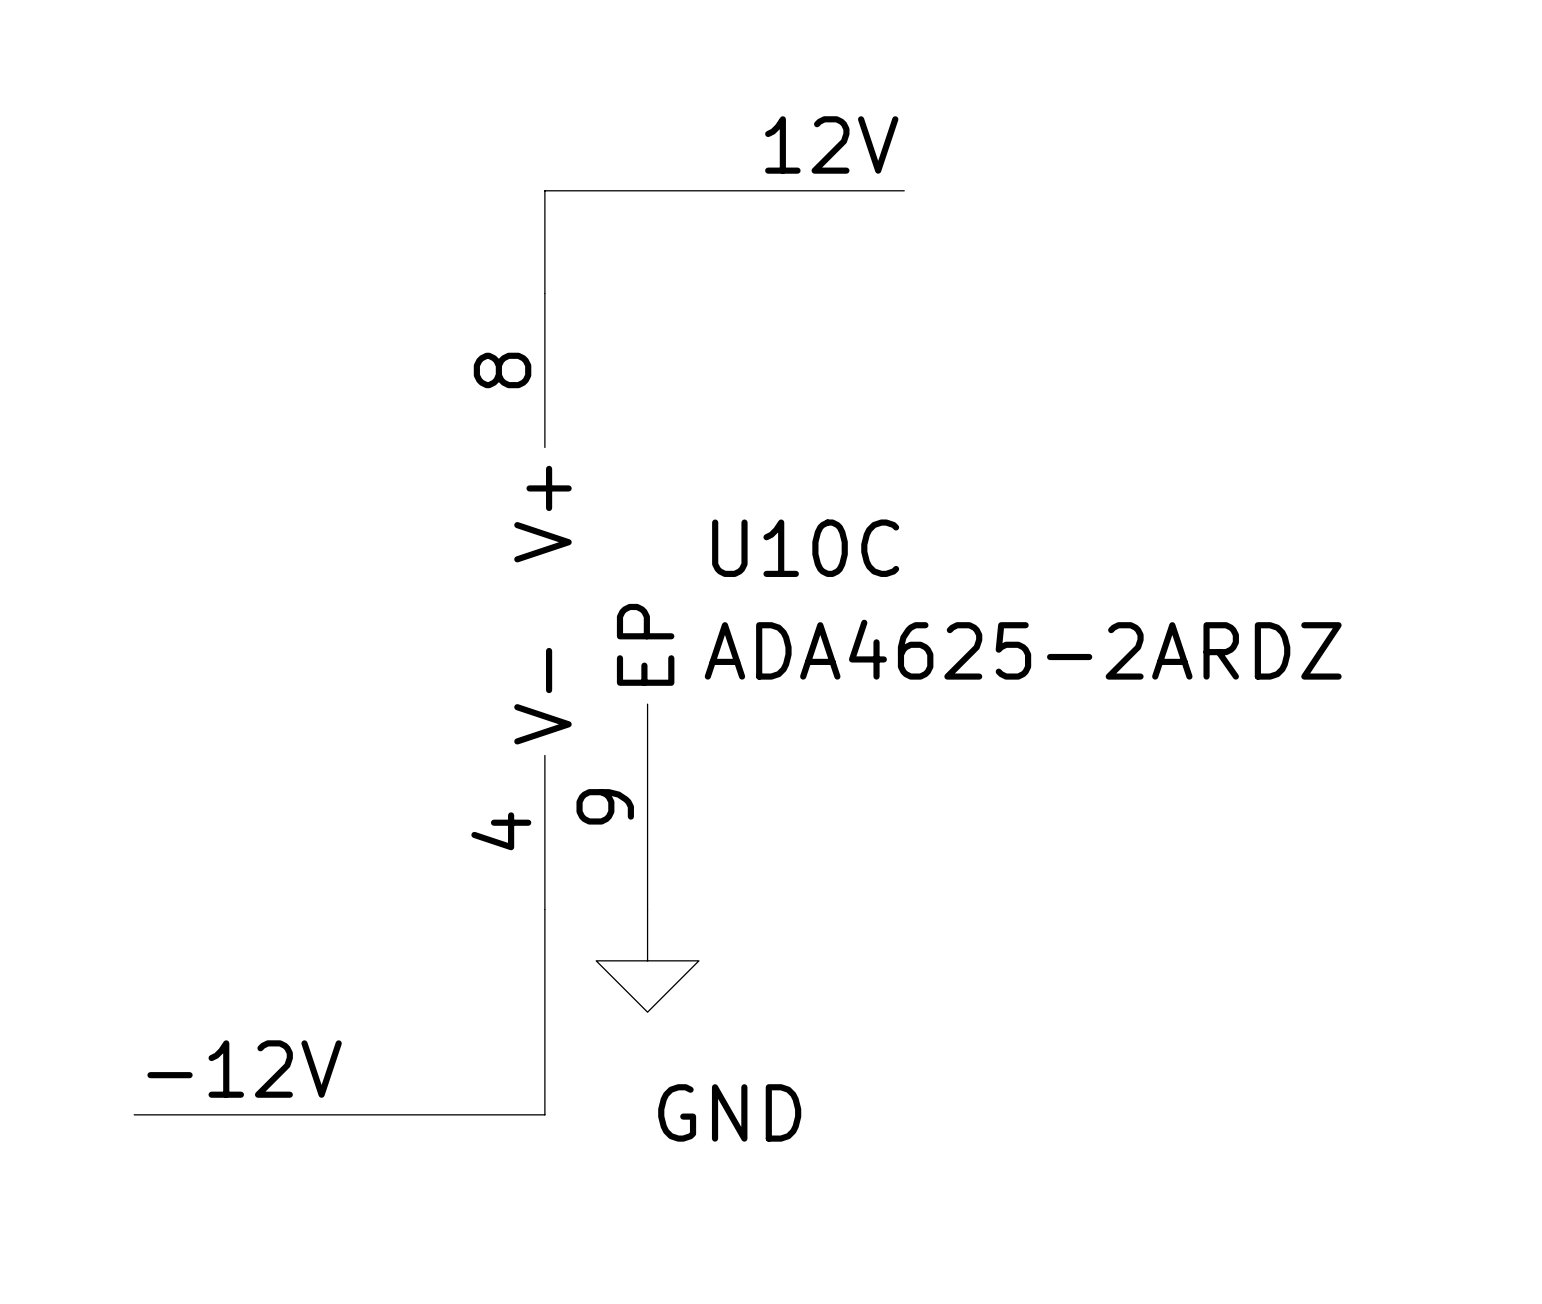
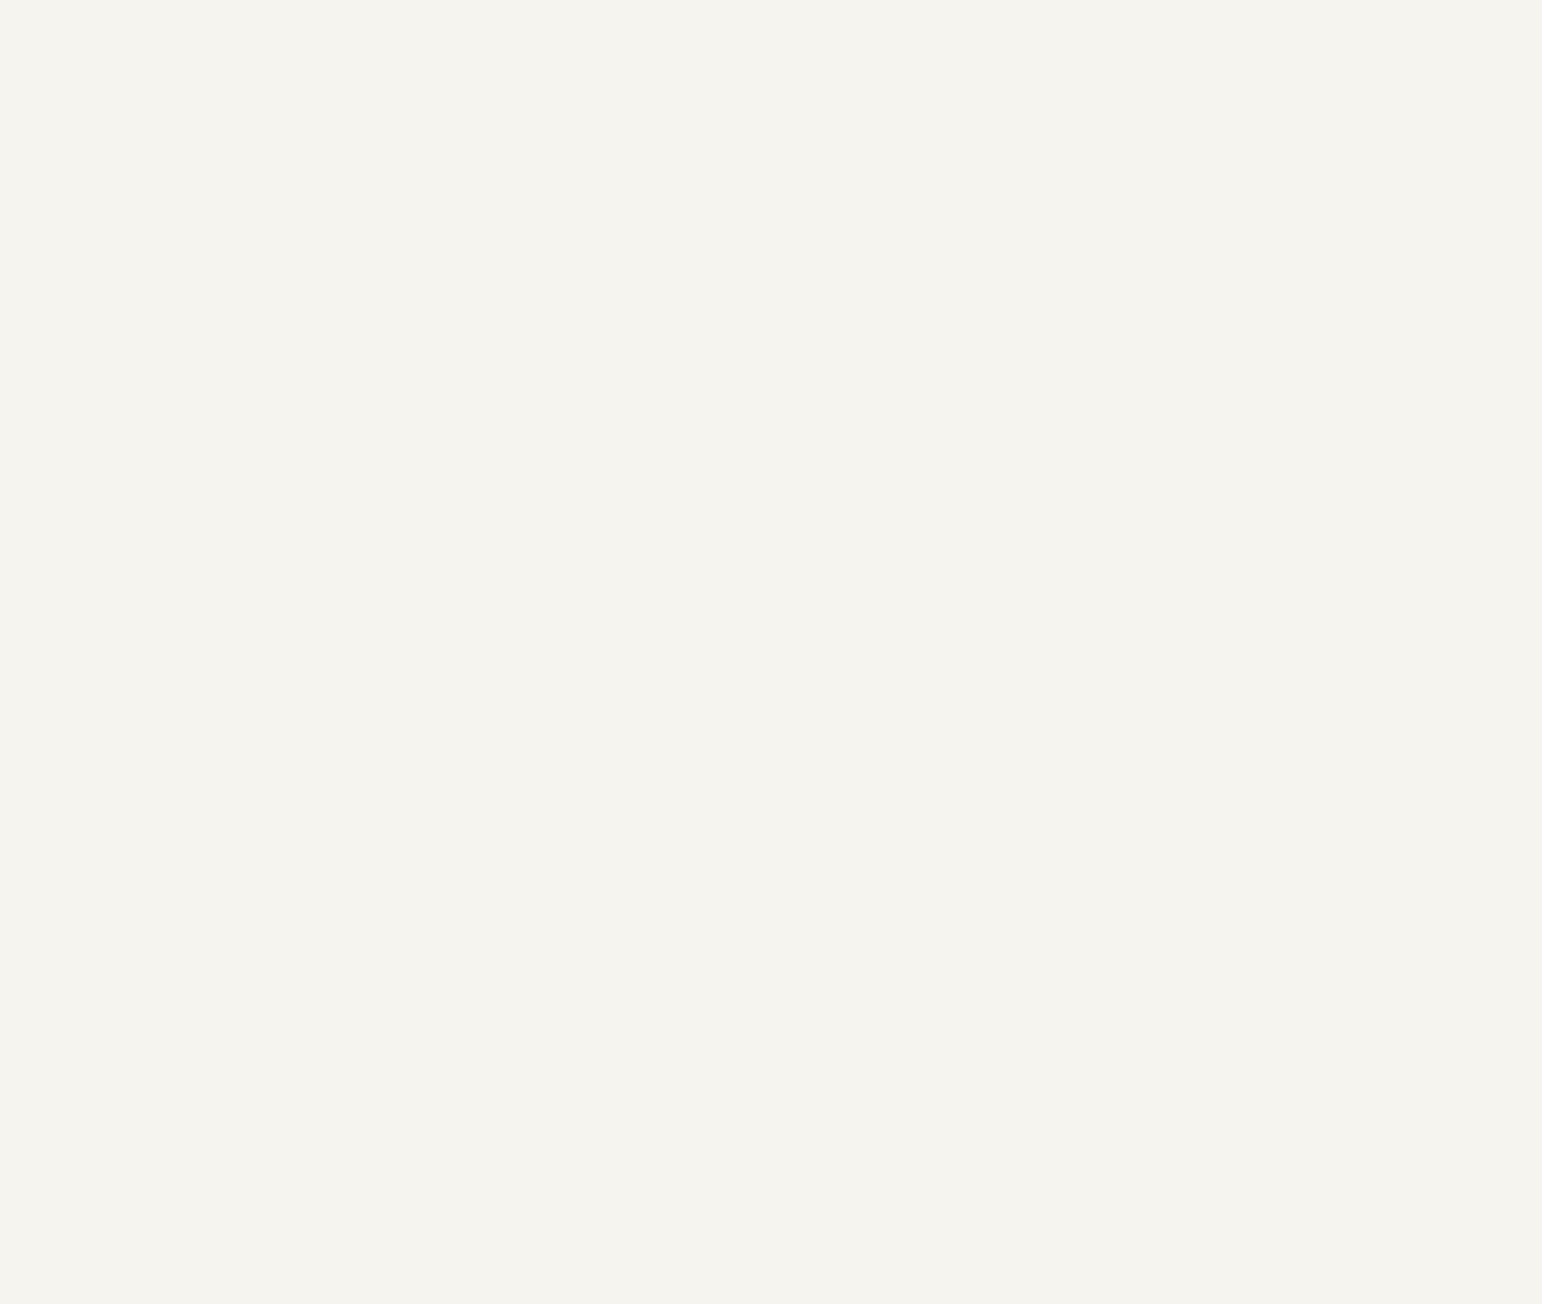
label: 12V (831, 144) -> none
wire: (904, 190) (544, 190) (544, 293) -> none
U10C: ADA4625-2ARDZ (596, 601) -> none
wire: (544, 909) (544, 1114) (134, 1114) -> none
power symbol: GND (647, 960) -> none
label: -12V (244, 1069) -> none

